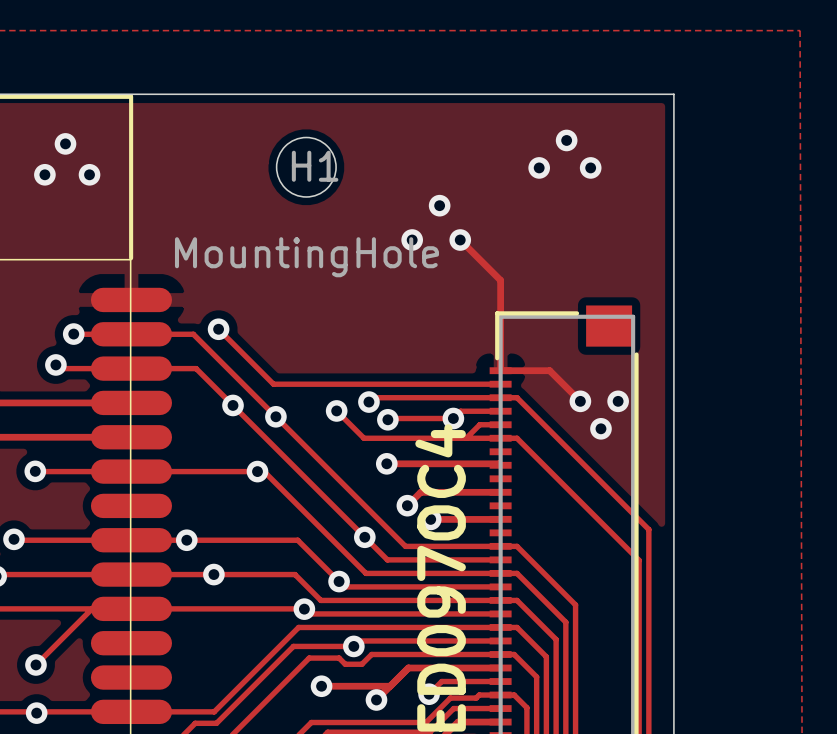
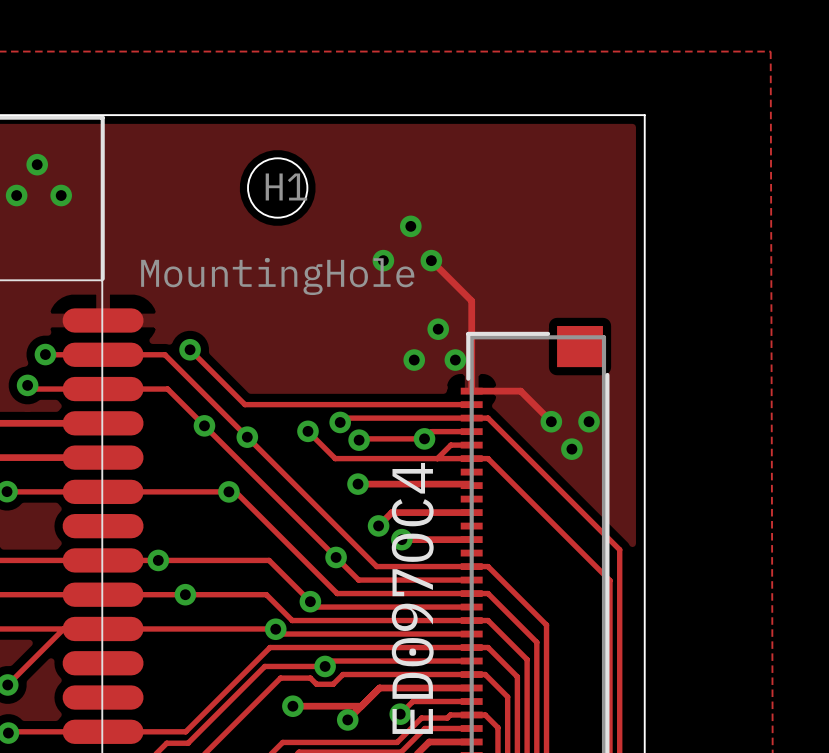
via: (566, 140) -> none
via: (539, 167) -> none
via: (590, 167) -> none
via: none -> (438, 329)
via: none -> (414, 360)
via: none -> (455, 360)

